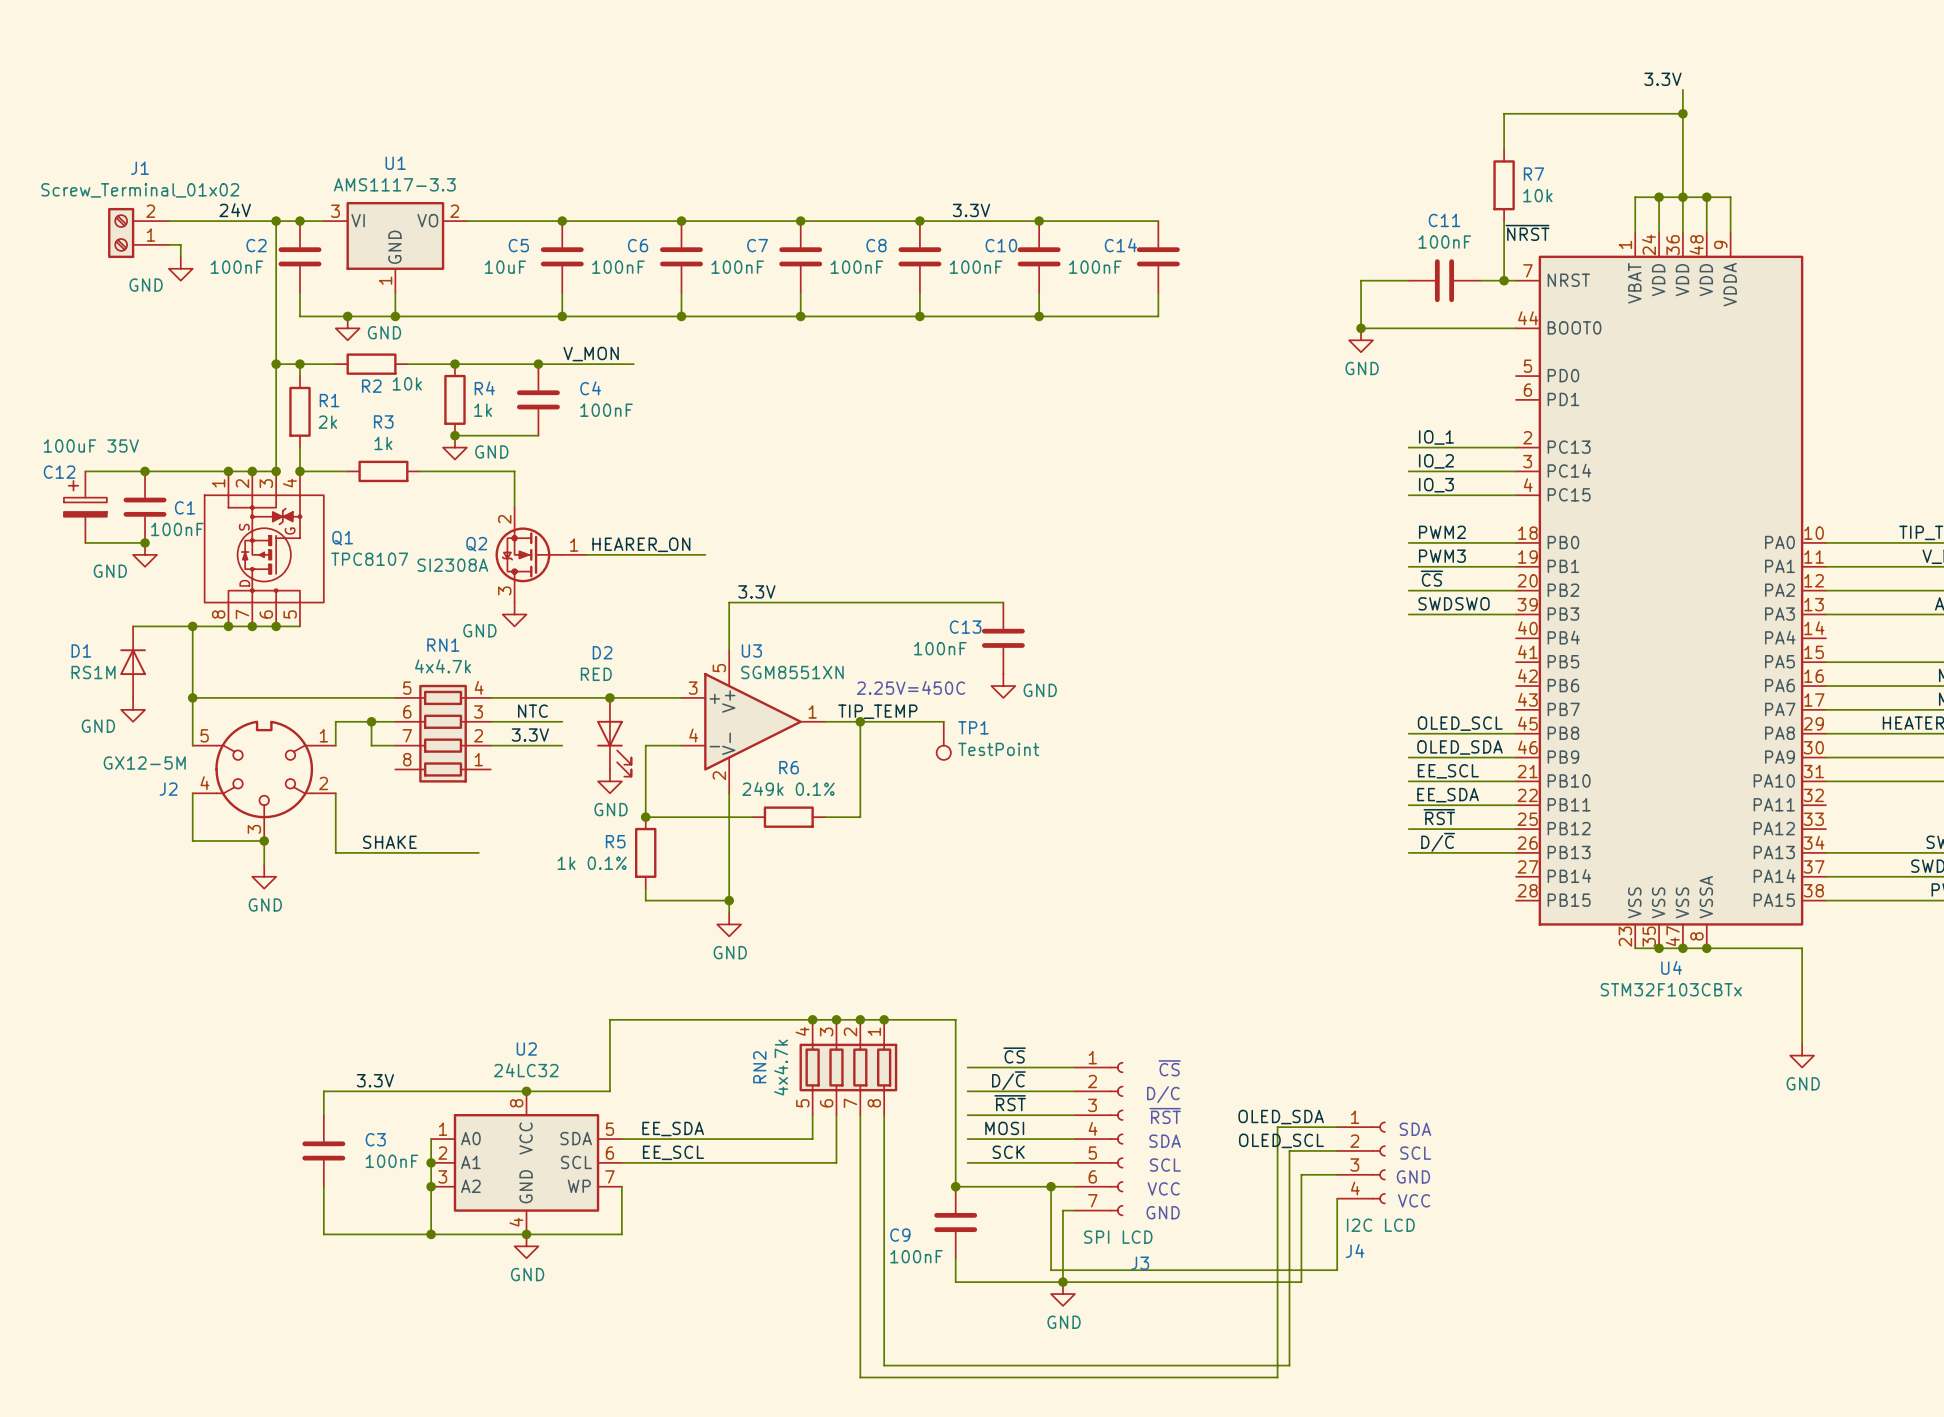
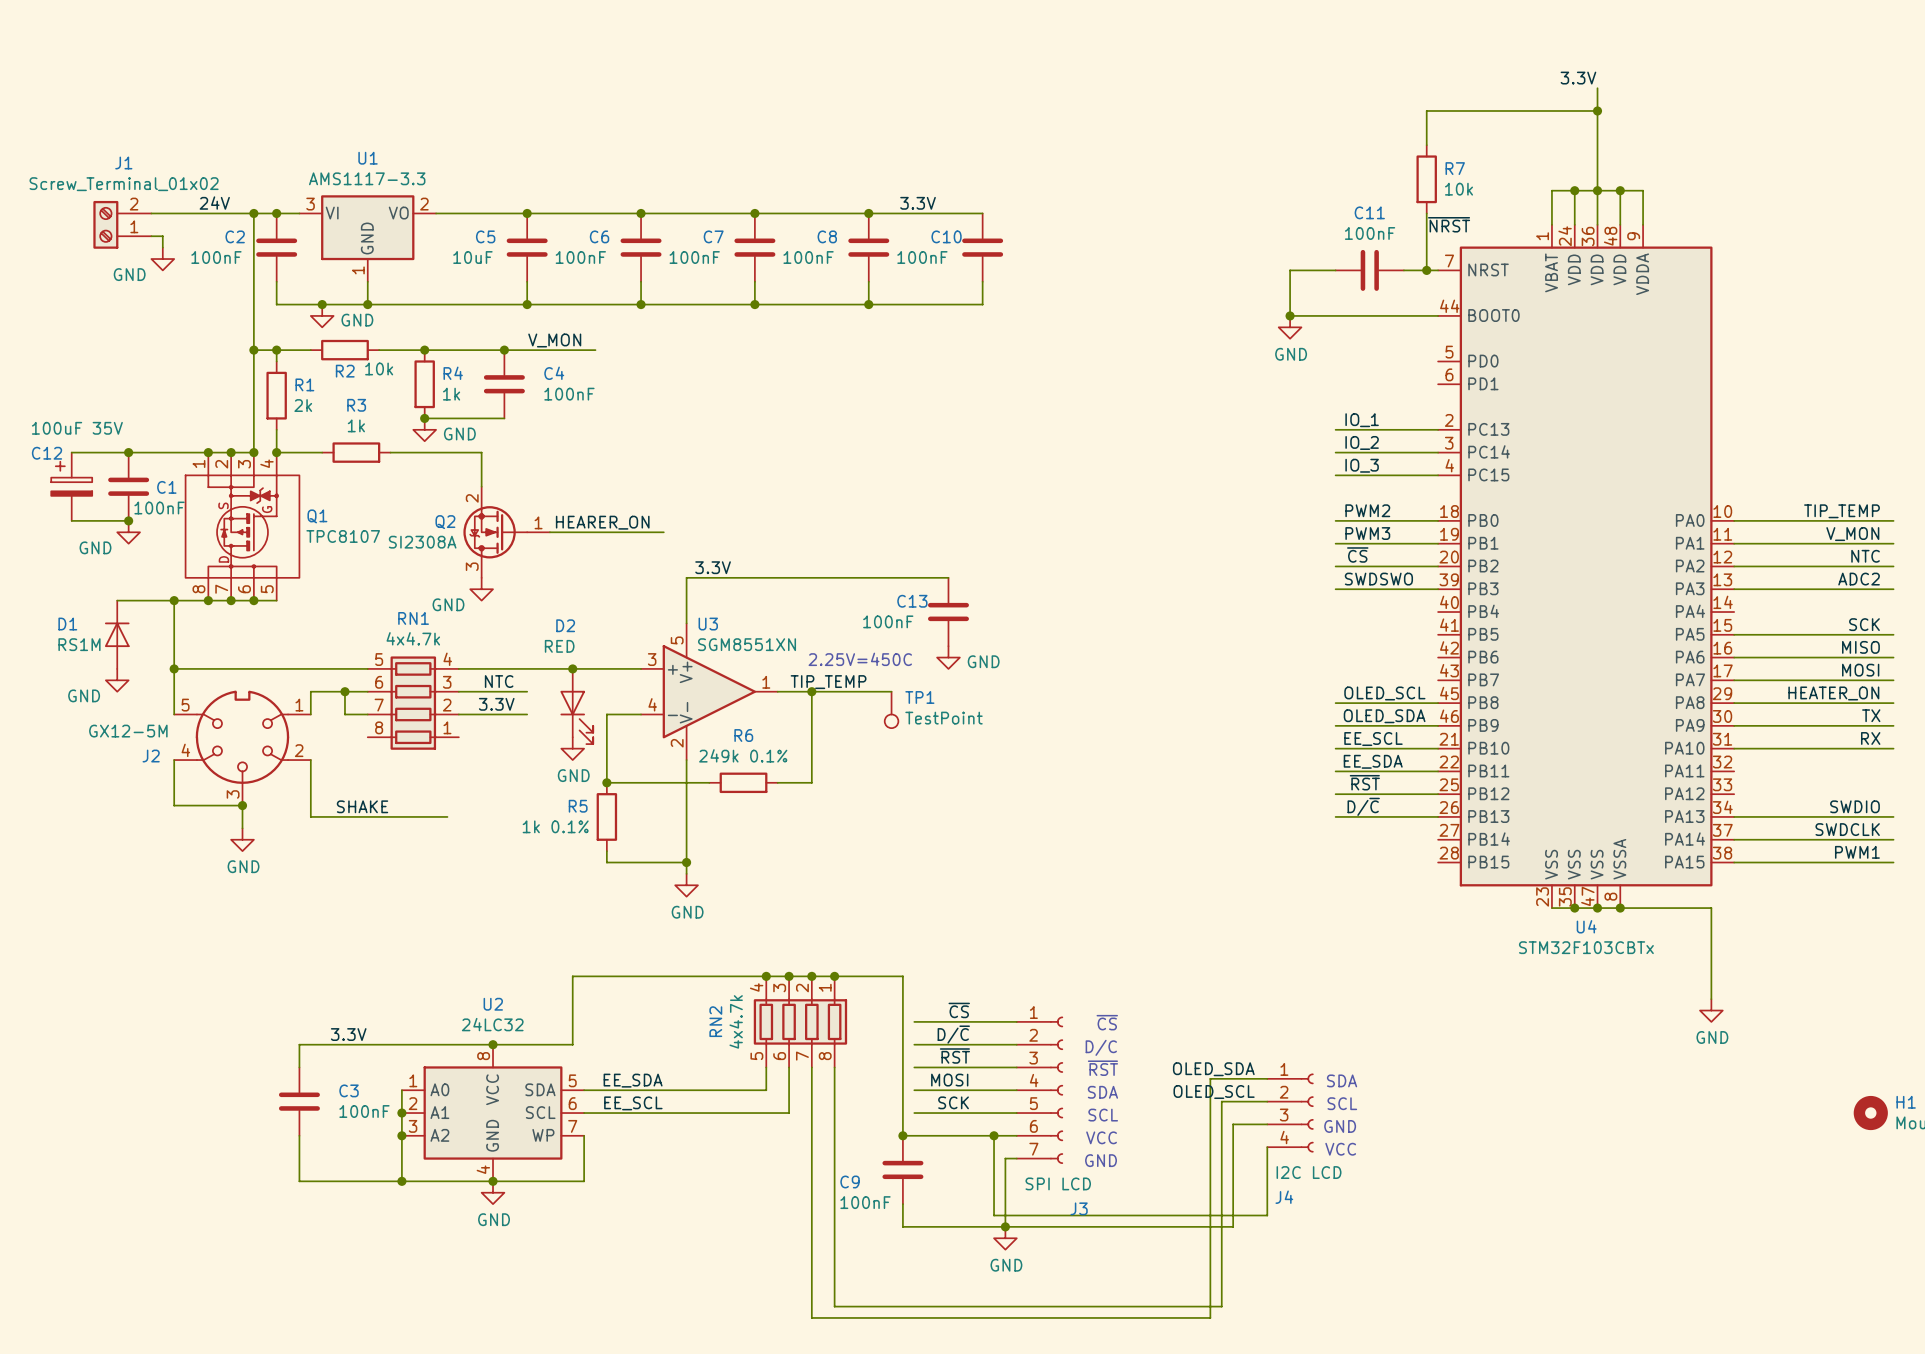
wire: (1039, 221) (1158, 221) -> none
junction: (1039, 221) -> none
C14: 100nF (1158, 256) -> none
wire: (1158, 292) (1158, 316) (1039, 316) -> none
junction: (1039, 316) -> none

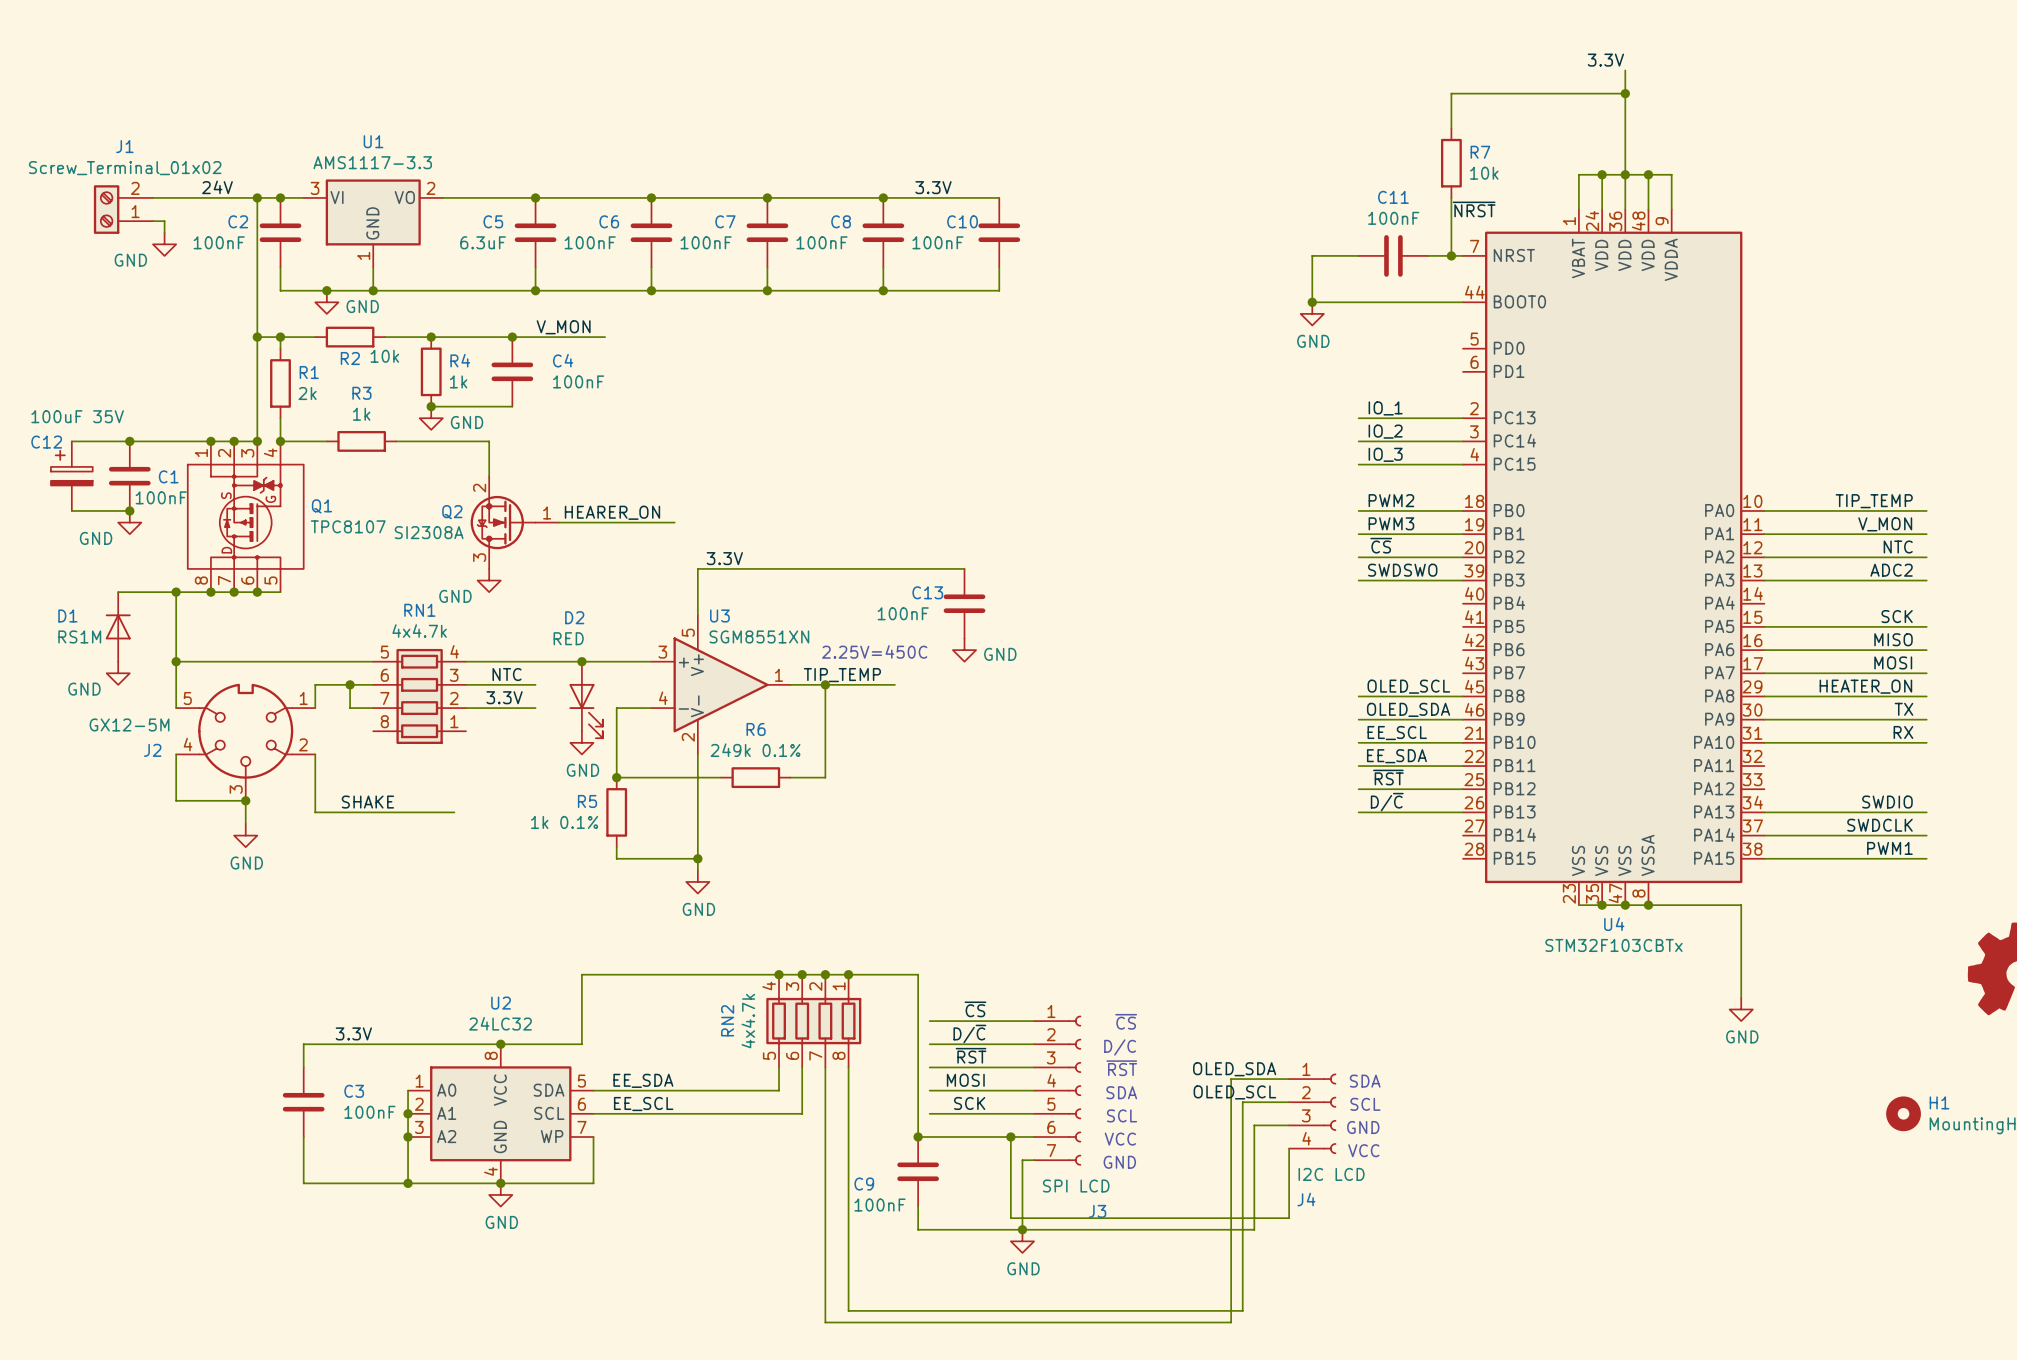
C5 value: 10uF (472, 257) -> 6.3uF (483, 242)
wire: (880, 691) (891, 691) -> none
TP1: TestPoint (891, 709) -> none

